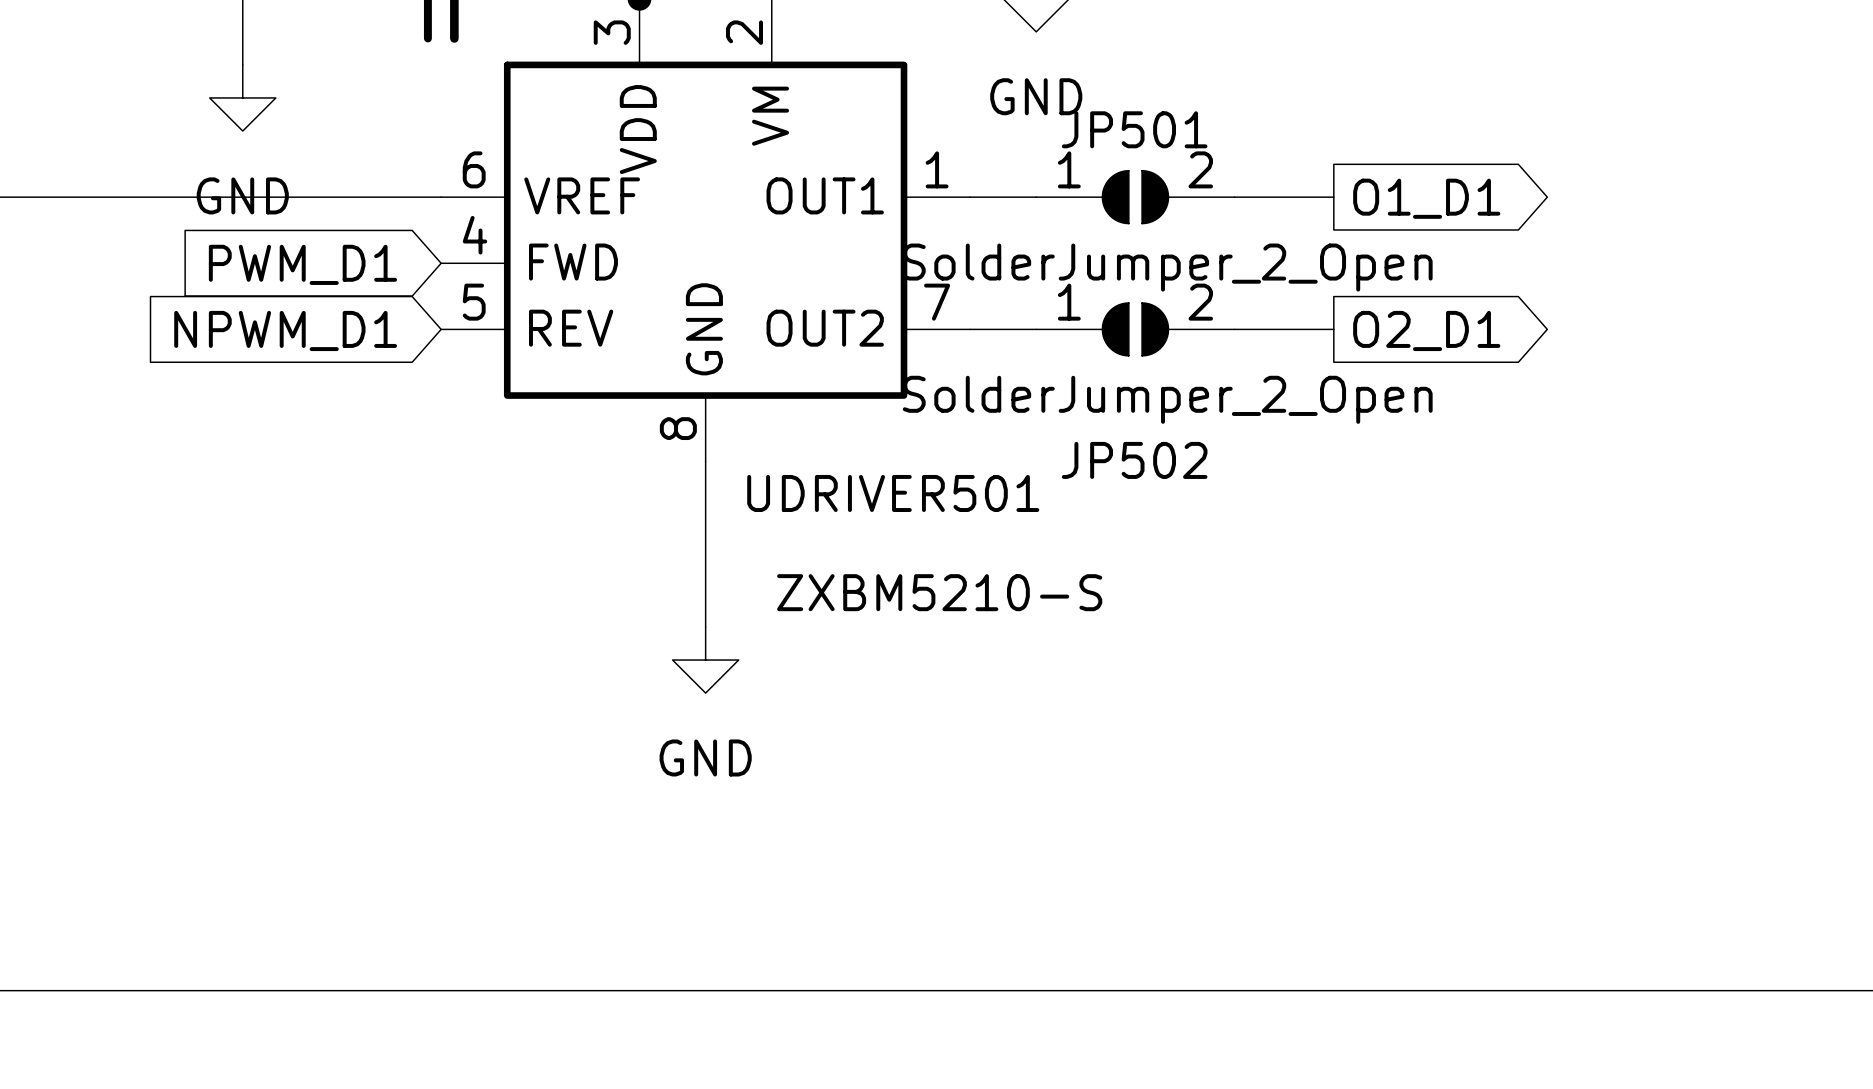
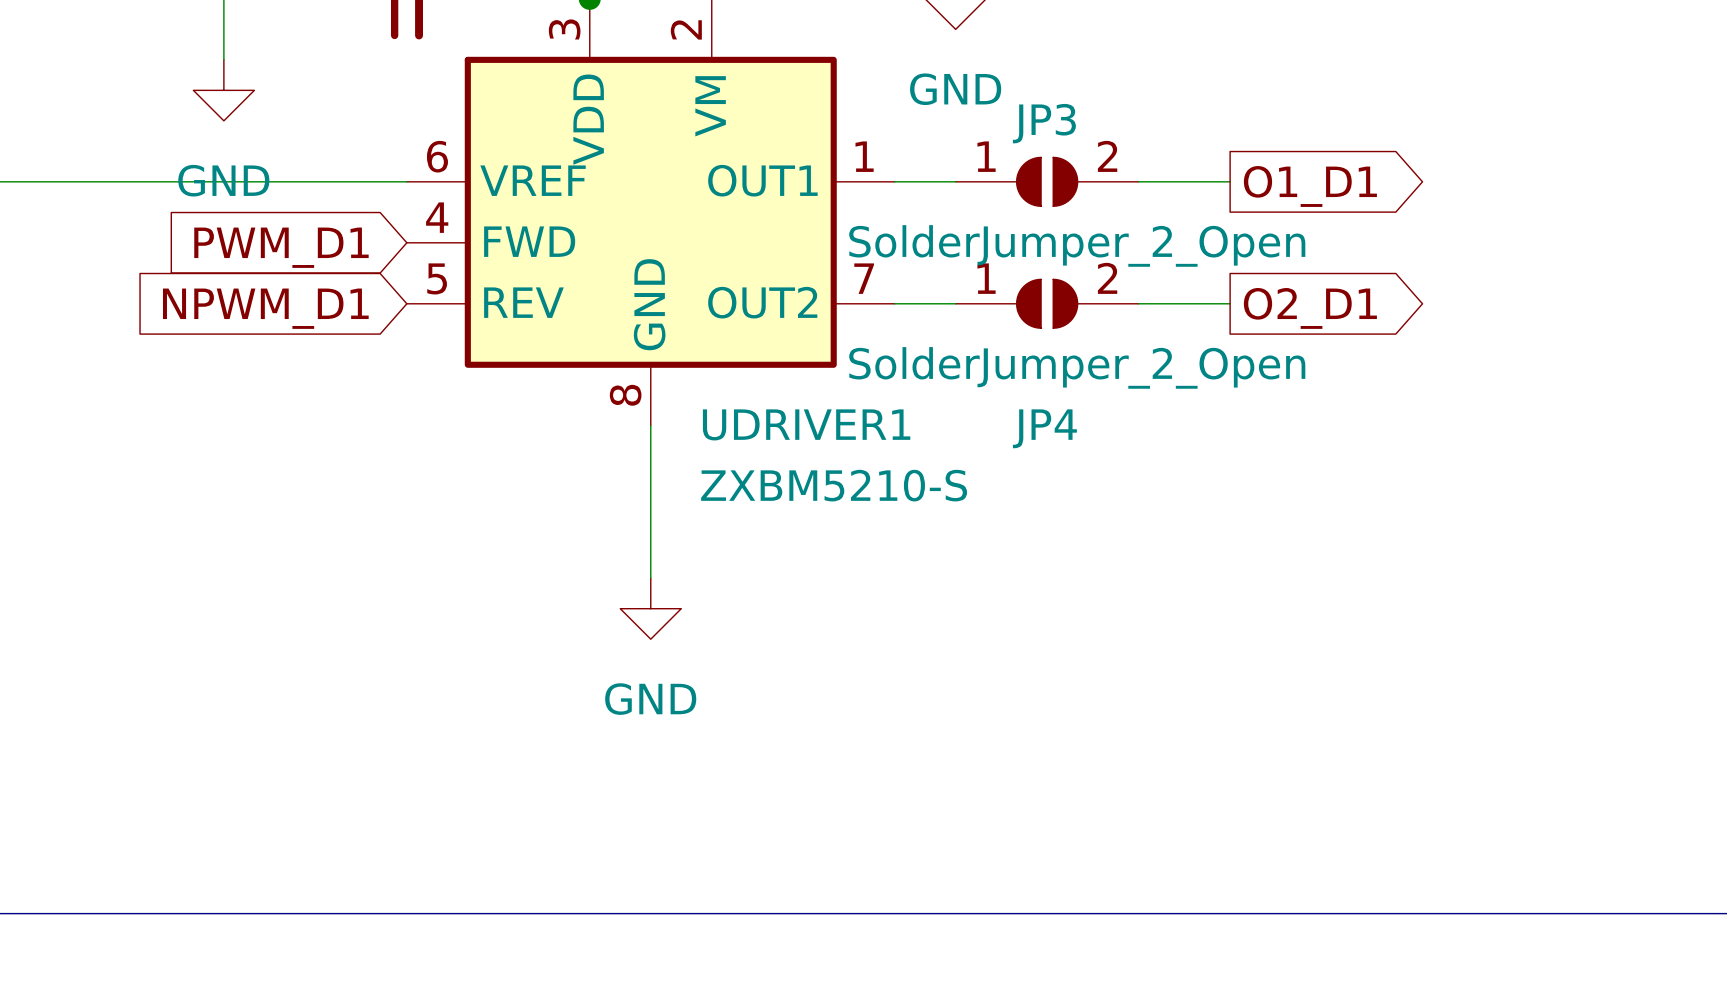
JP501 name: JP501 (1134, 129) -> JP3 (1044, 123)
JP502 name: JP502 (1134, 460) -> JP4 (1044, 428)
UDRIVER501 name: UDRIVER501 (893, 493) -> UDRIVER1 (806, 424)
UDRIVER501 value position: ZXBM5210-S (939, 592) -> ZXBM5210-S (834, 485)

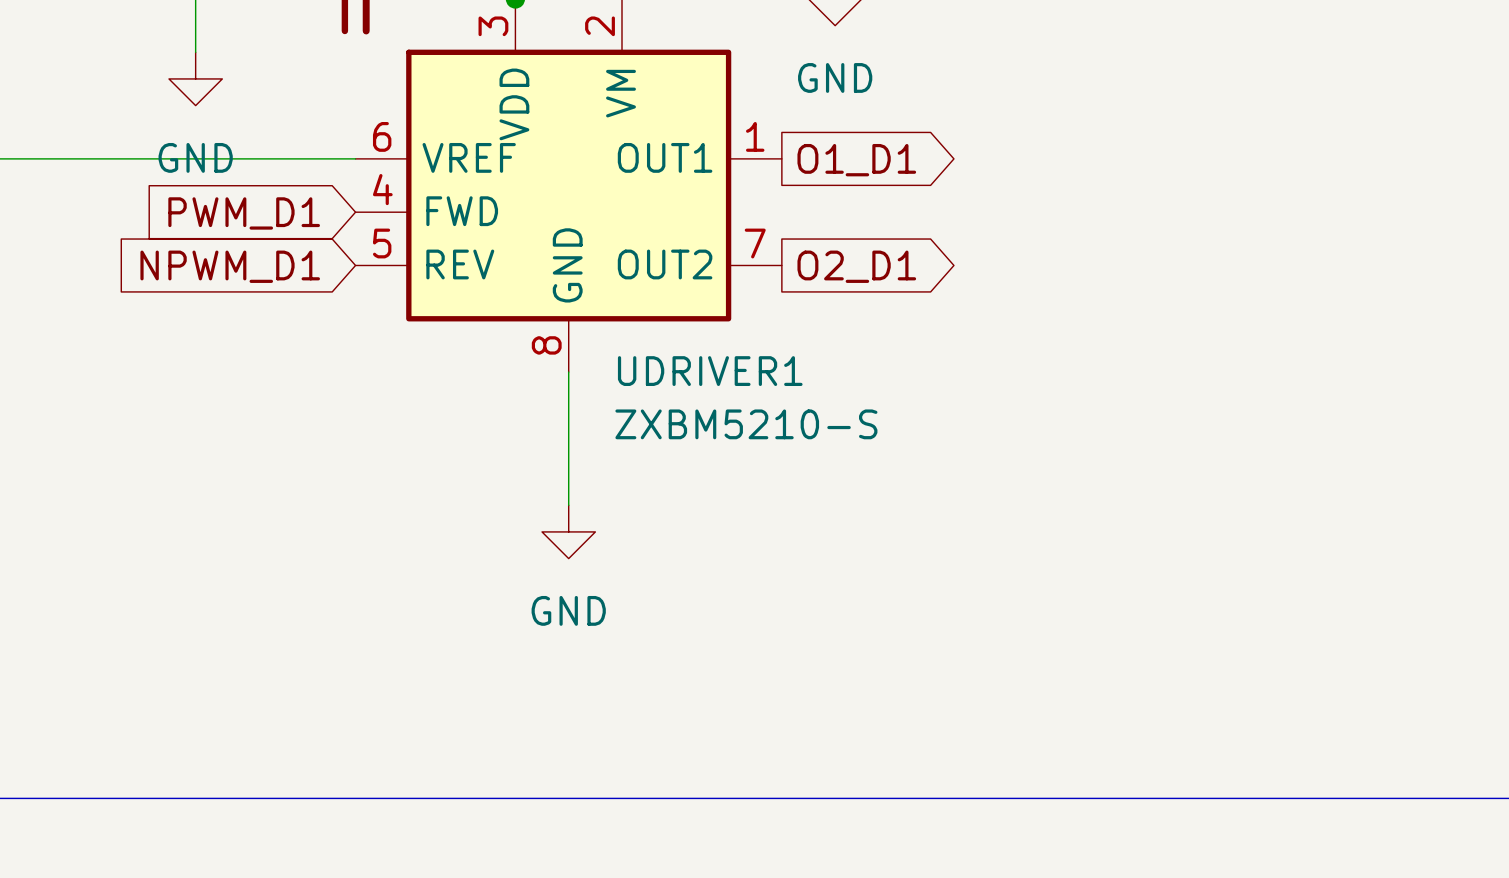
wire: (894, 181) (955, 181) -> none
JP3: SolderJumper_2_Open (1047, 181) -> none
wire: (1138, 181) (1230, 181) -> none
global label position: O1_D1 (1310, 186) -> O1_D1 (856, 160)
wire: (894, 303) (955, 303) -> none
JP4: SolderJumper_2_Open (1047, 303) -> none
wire: (1138, 303) (1230, 303) -> none
global label position: O2_D1 (1310, 308) -> O2_D1 (856, 266)

